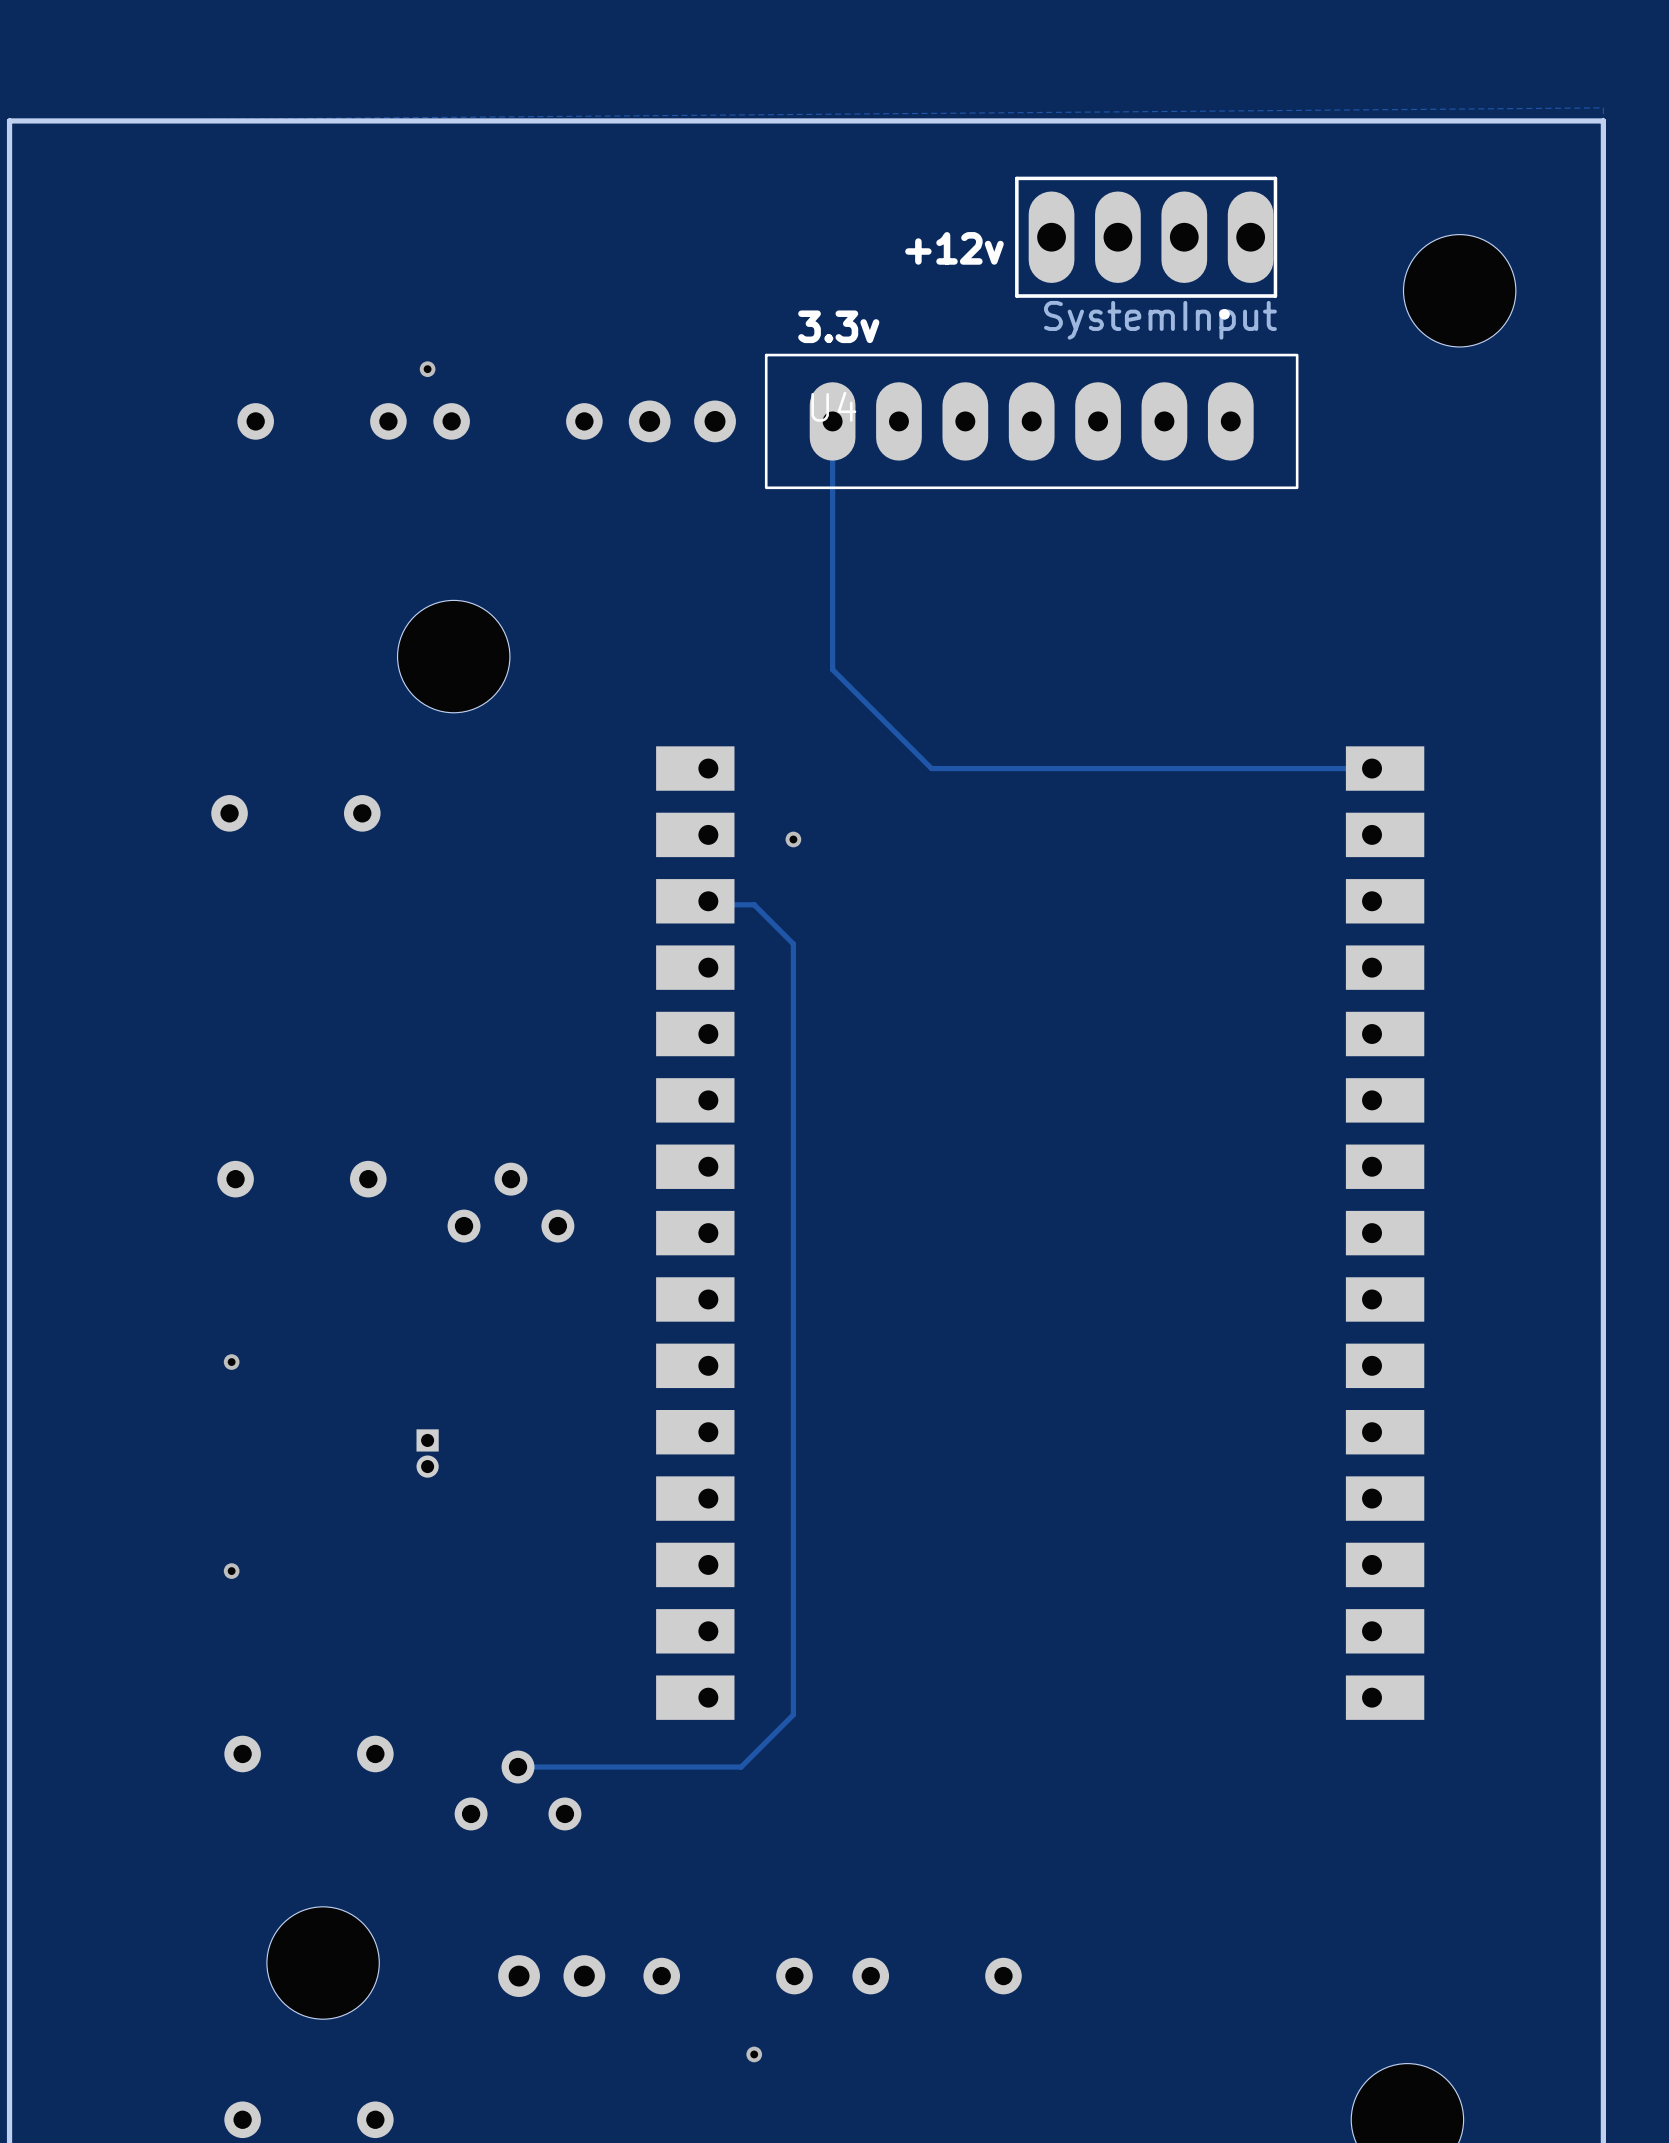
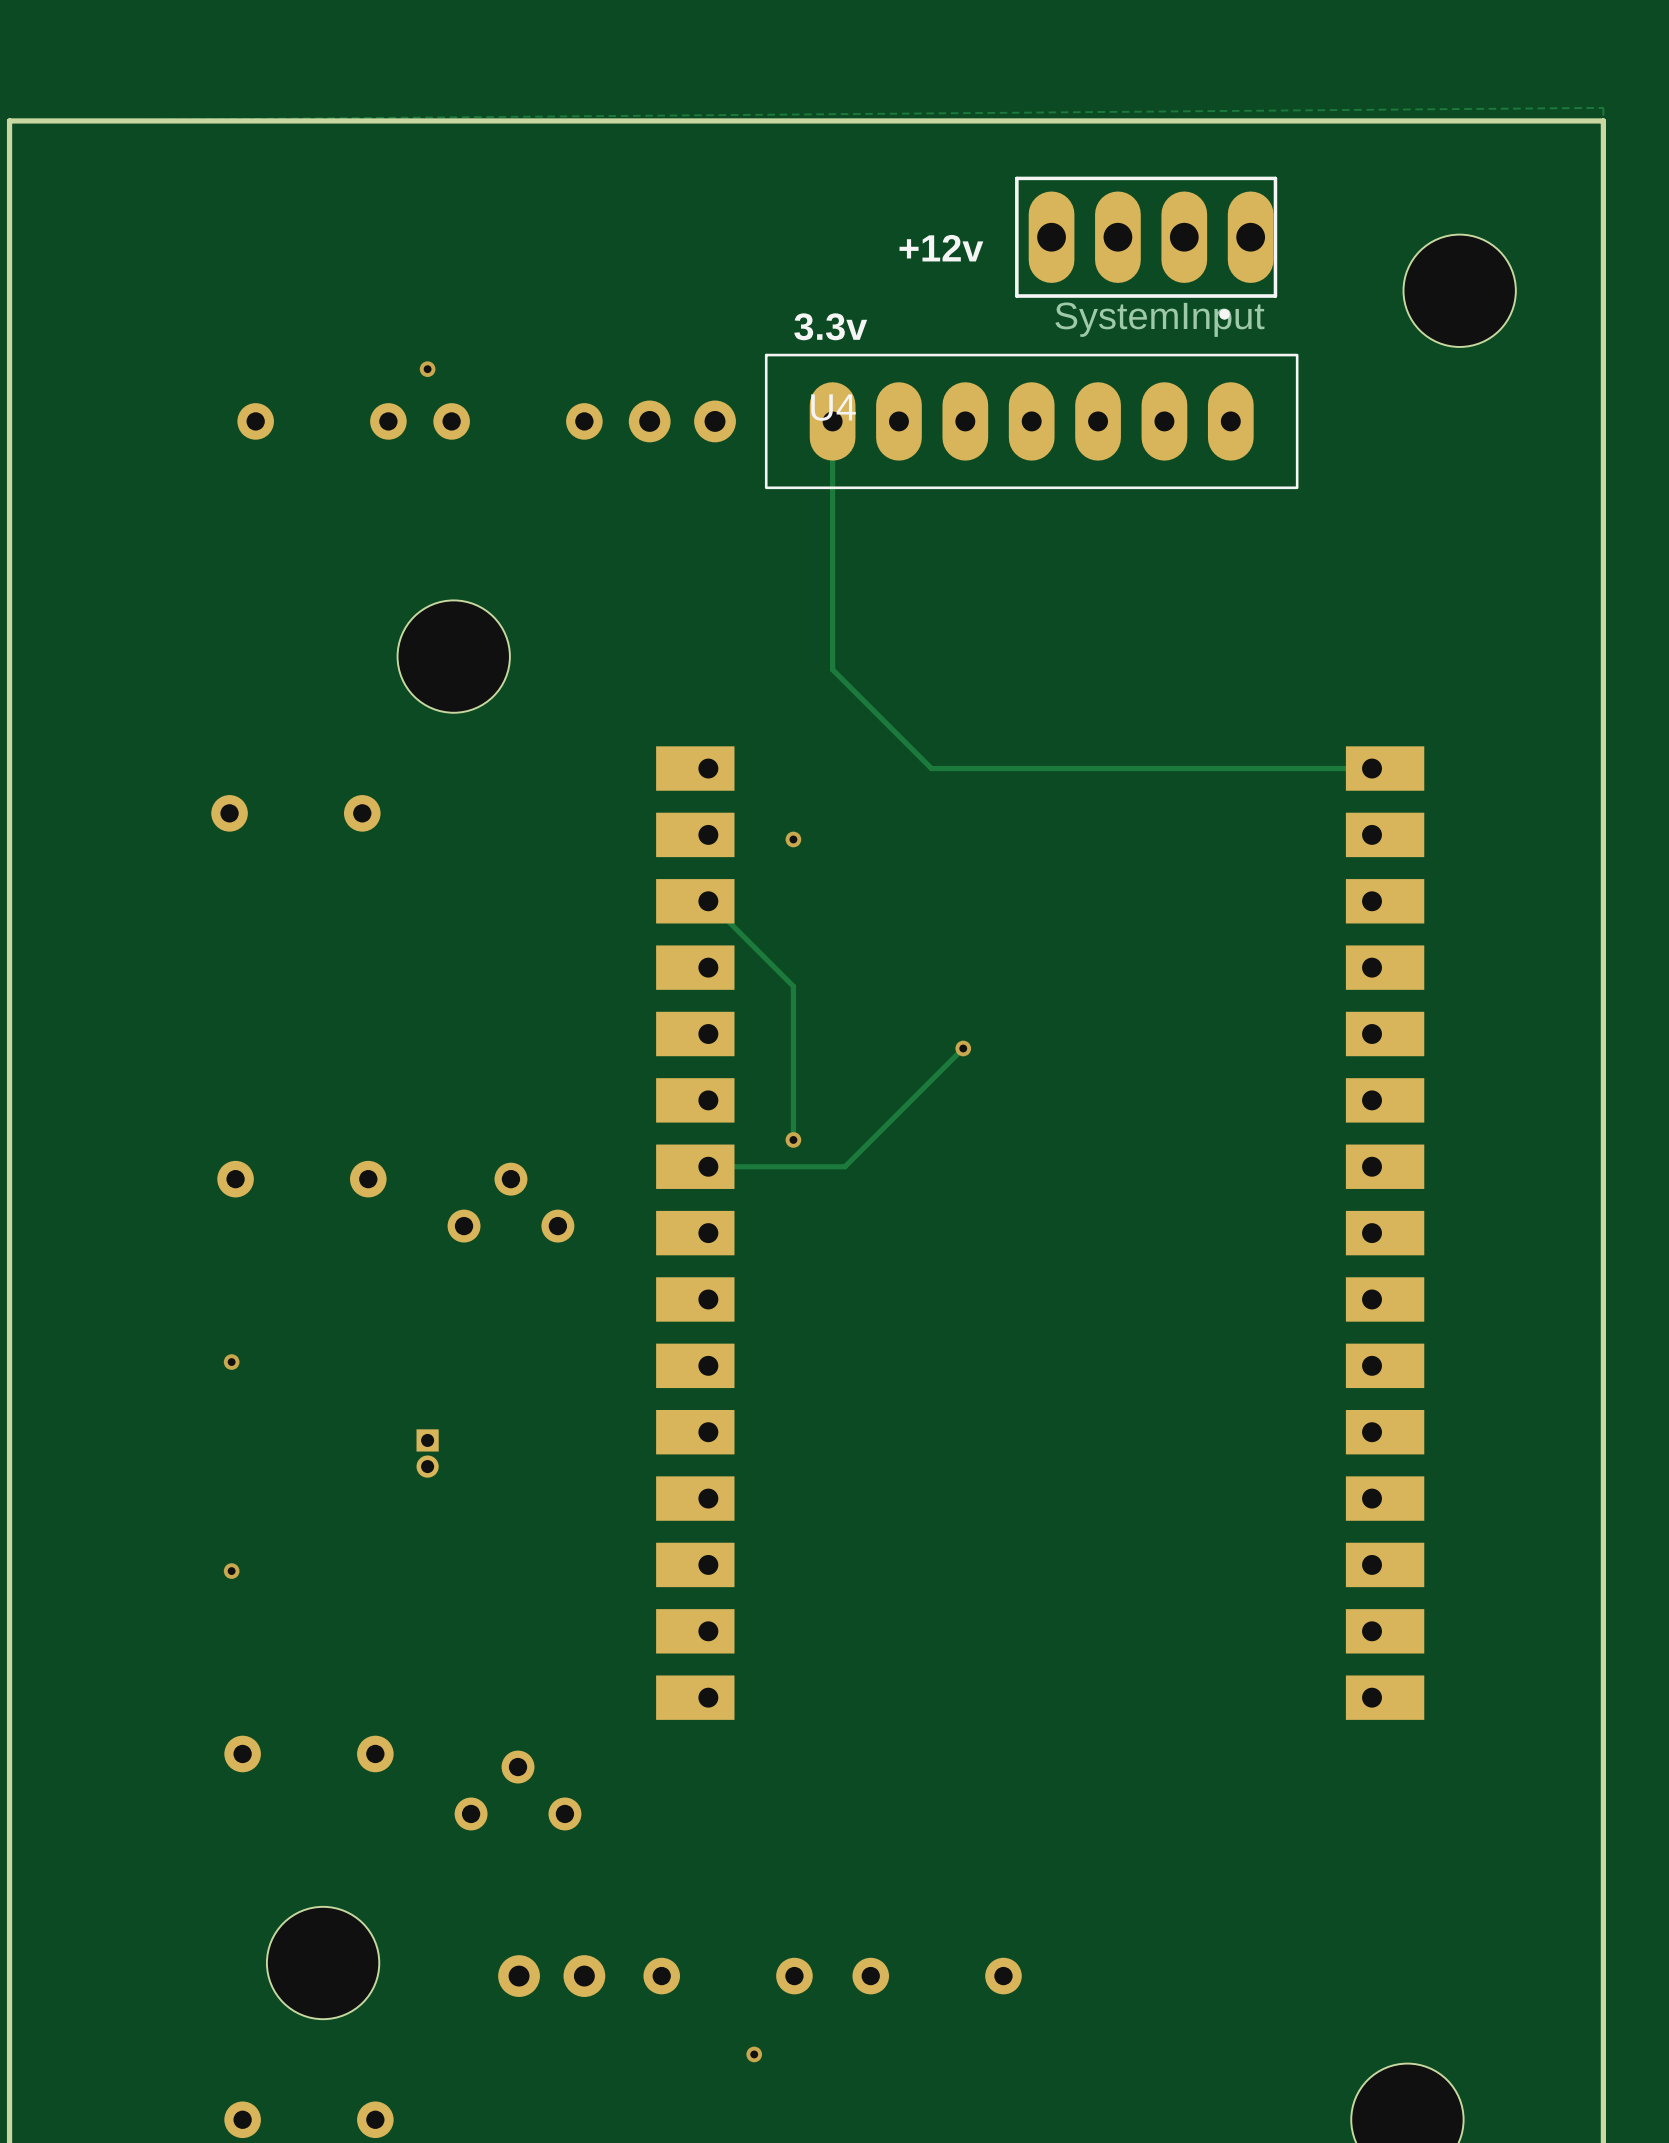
track: (711, 904) (754, 904) (793, 943) (793, 986) -> (711, 904) (793, 986)
track: none -> (963, 1048) (845, 1166) (708, 1166)
via: none -> (963, 1048)
track: (793, 1139) (793, 1714) (741, 1767) (518, 1767) -> none
via: none -> (793, 1139)

